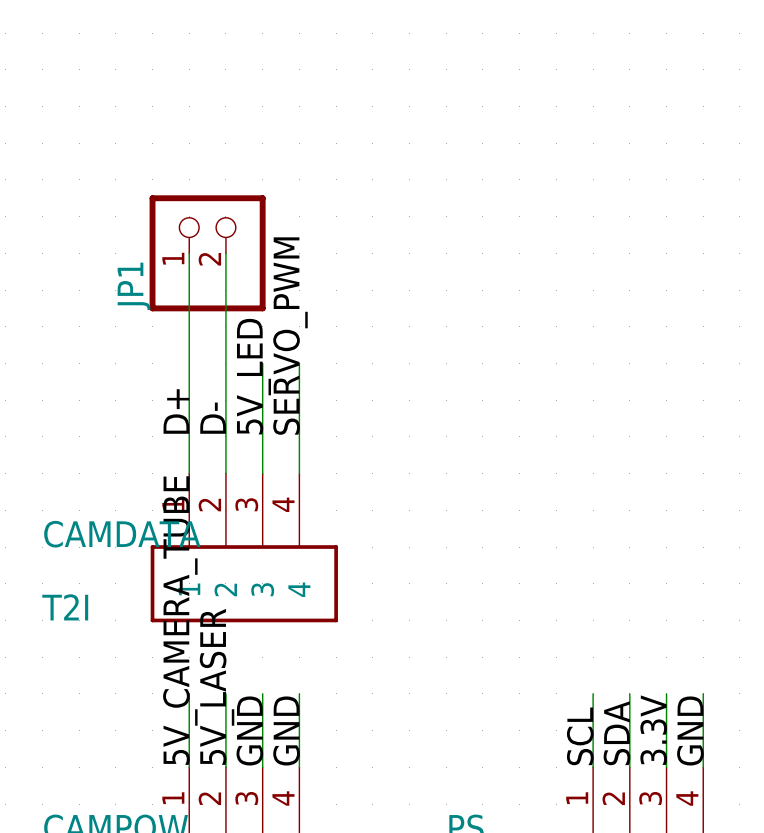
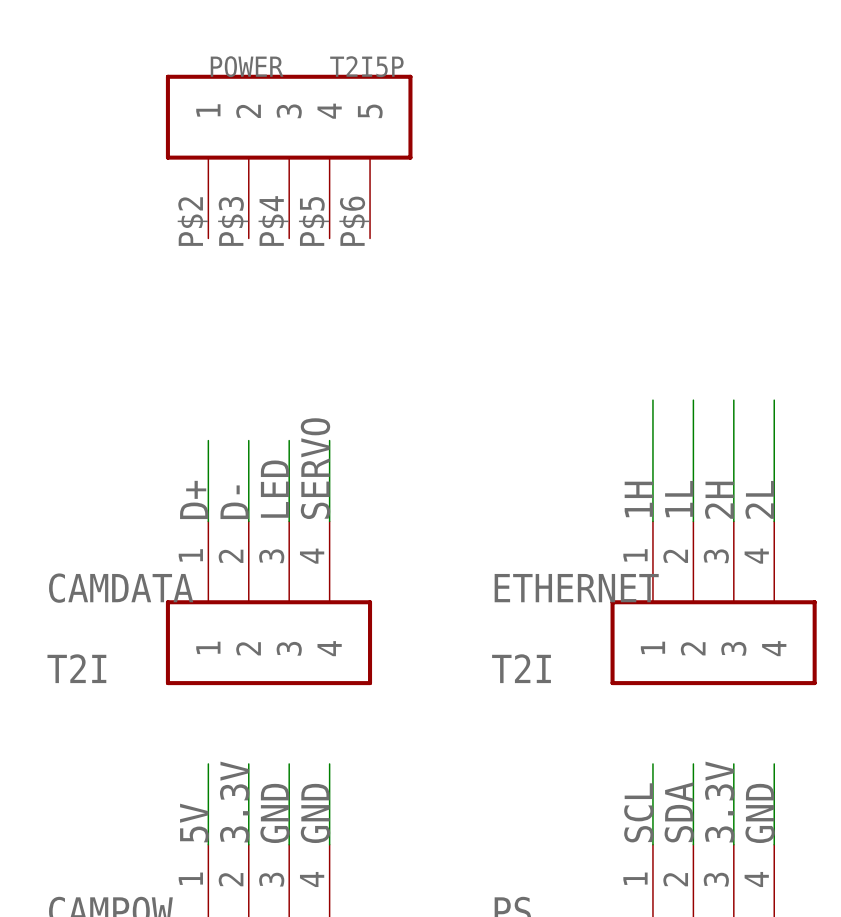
POWER: none -> T2I5P (289, 156)
wire: (189, 253) (189, 400) -> none
JP1: (207, 253) -> none
wire: (225, 253) (225, 400) -> none
label: SERVO_PWM (290, 336) -> SERVO (315, 468)
wire: (262, 363) (262, 400) -> none
wire: (299, 363) (299, 400) -> none
wire: none -> (652, 400) (652, 521)
wire: none -> (693, 400) (693, 521)
wire: none -> (733, 400) (733, 521)
wire: none -> (774, 400) (774, 521)
label: 5V_LED (253, 376) -> LED (275, 489)
label position: D+ (176, 411) -> D+ (194, 499)
label position: D- (213, 418) -> D- (234, 502)
label: none -> 1H (638, 499)
label: none -> 2H (719, 500)
label: none -> 1L (679, 499)
label: none -> 2L (759, 499)
ETHERNET: none -> T2I (713, 603)
label: 5V_CAMERA_TUBE (180, 620) -> 5V (194, 823)
label: 5V_LASER (217, 686) -> 3.3V (234, 802)

